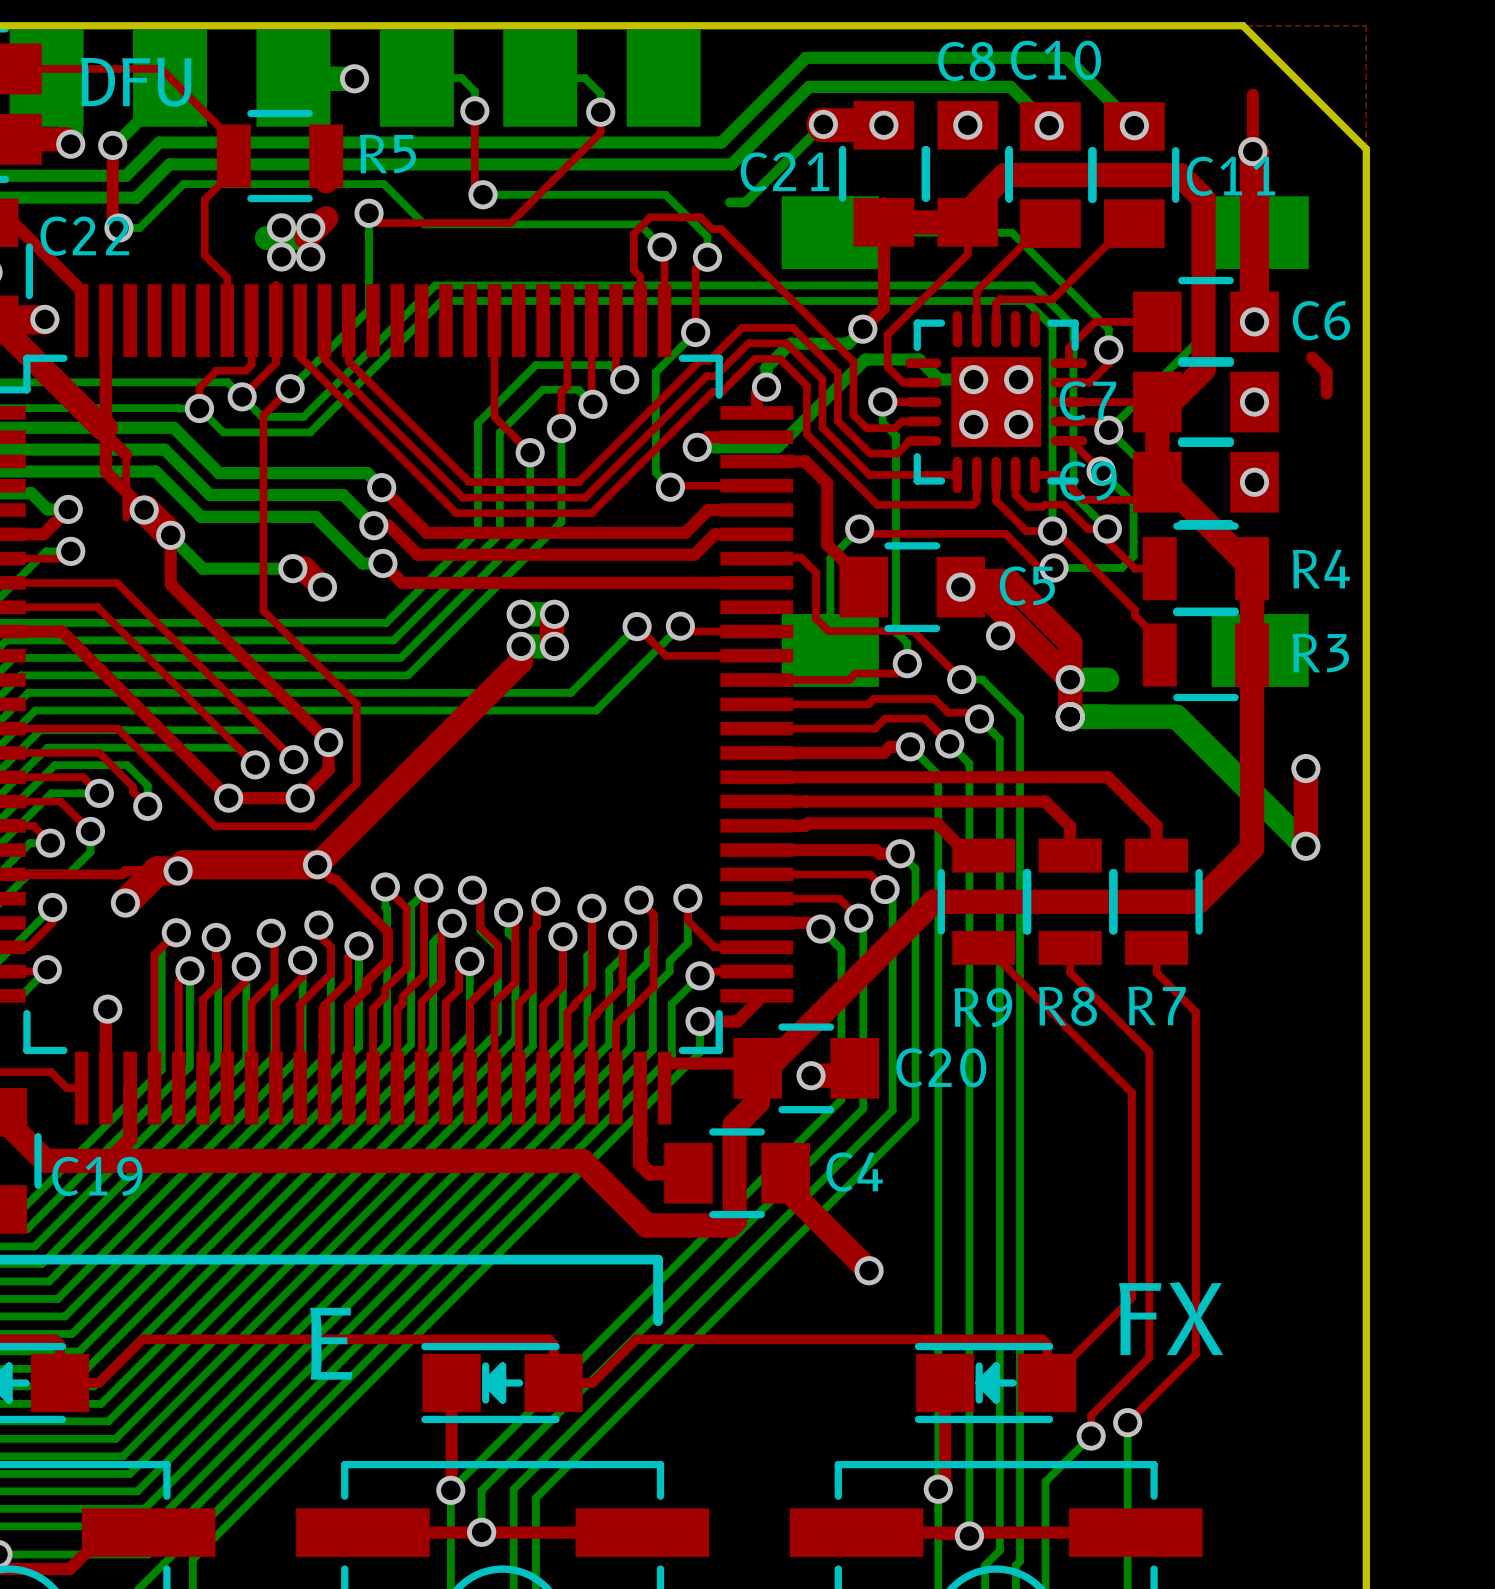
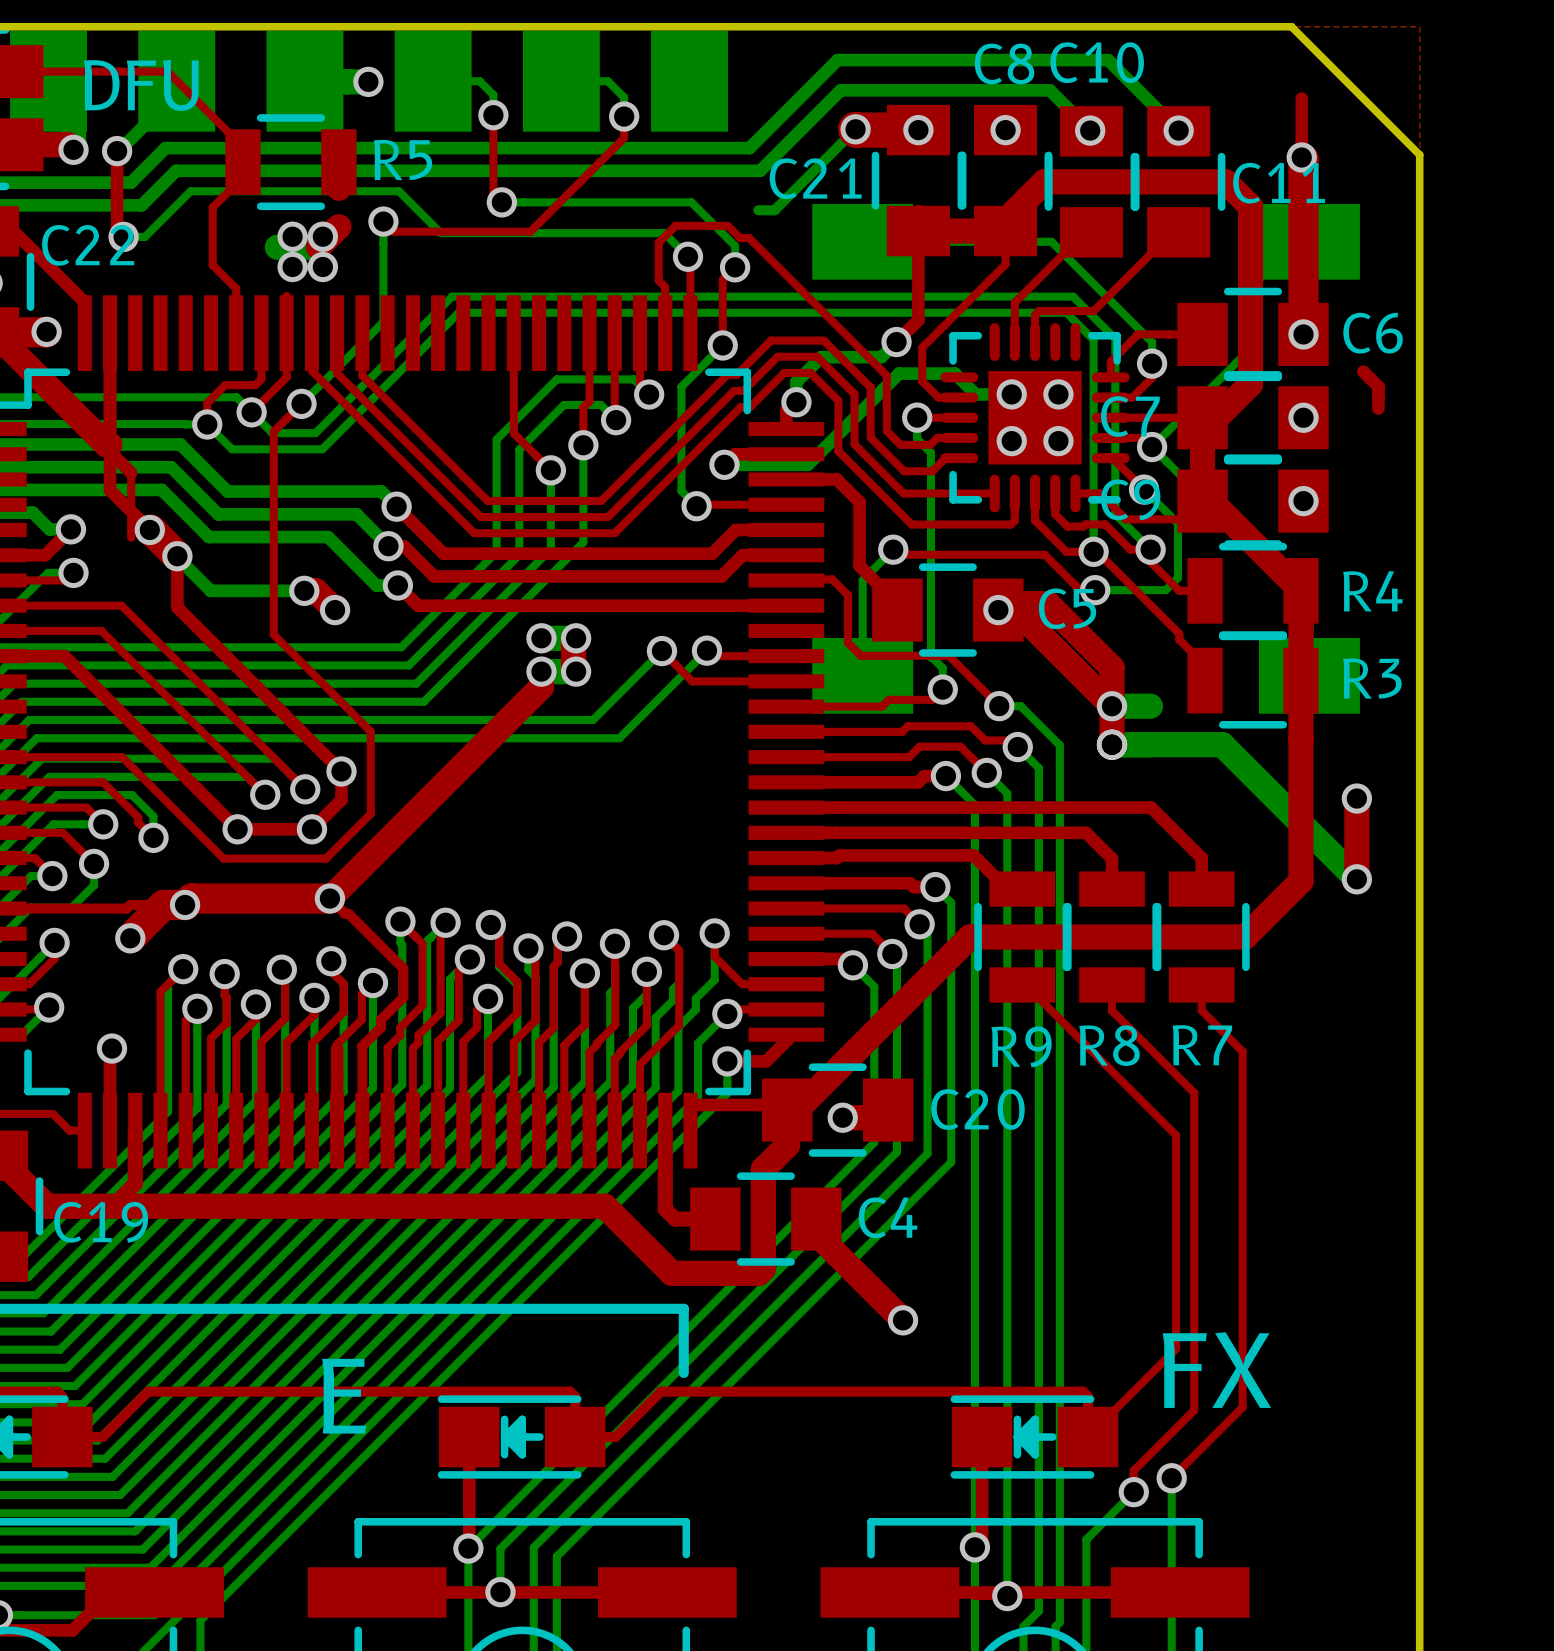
via: (1000, 635) -> none

